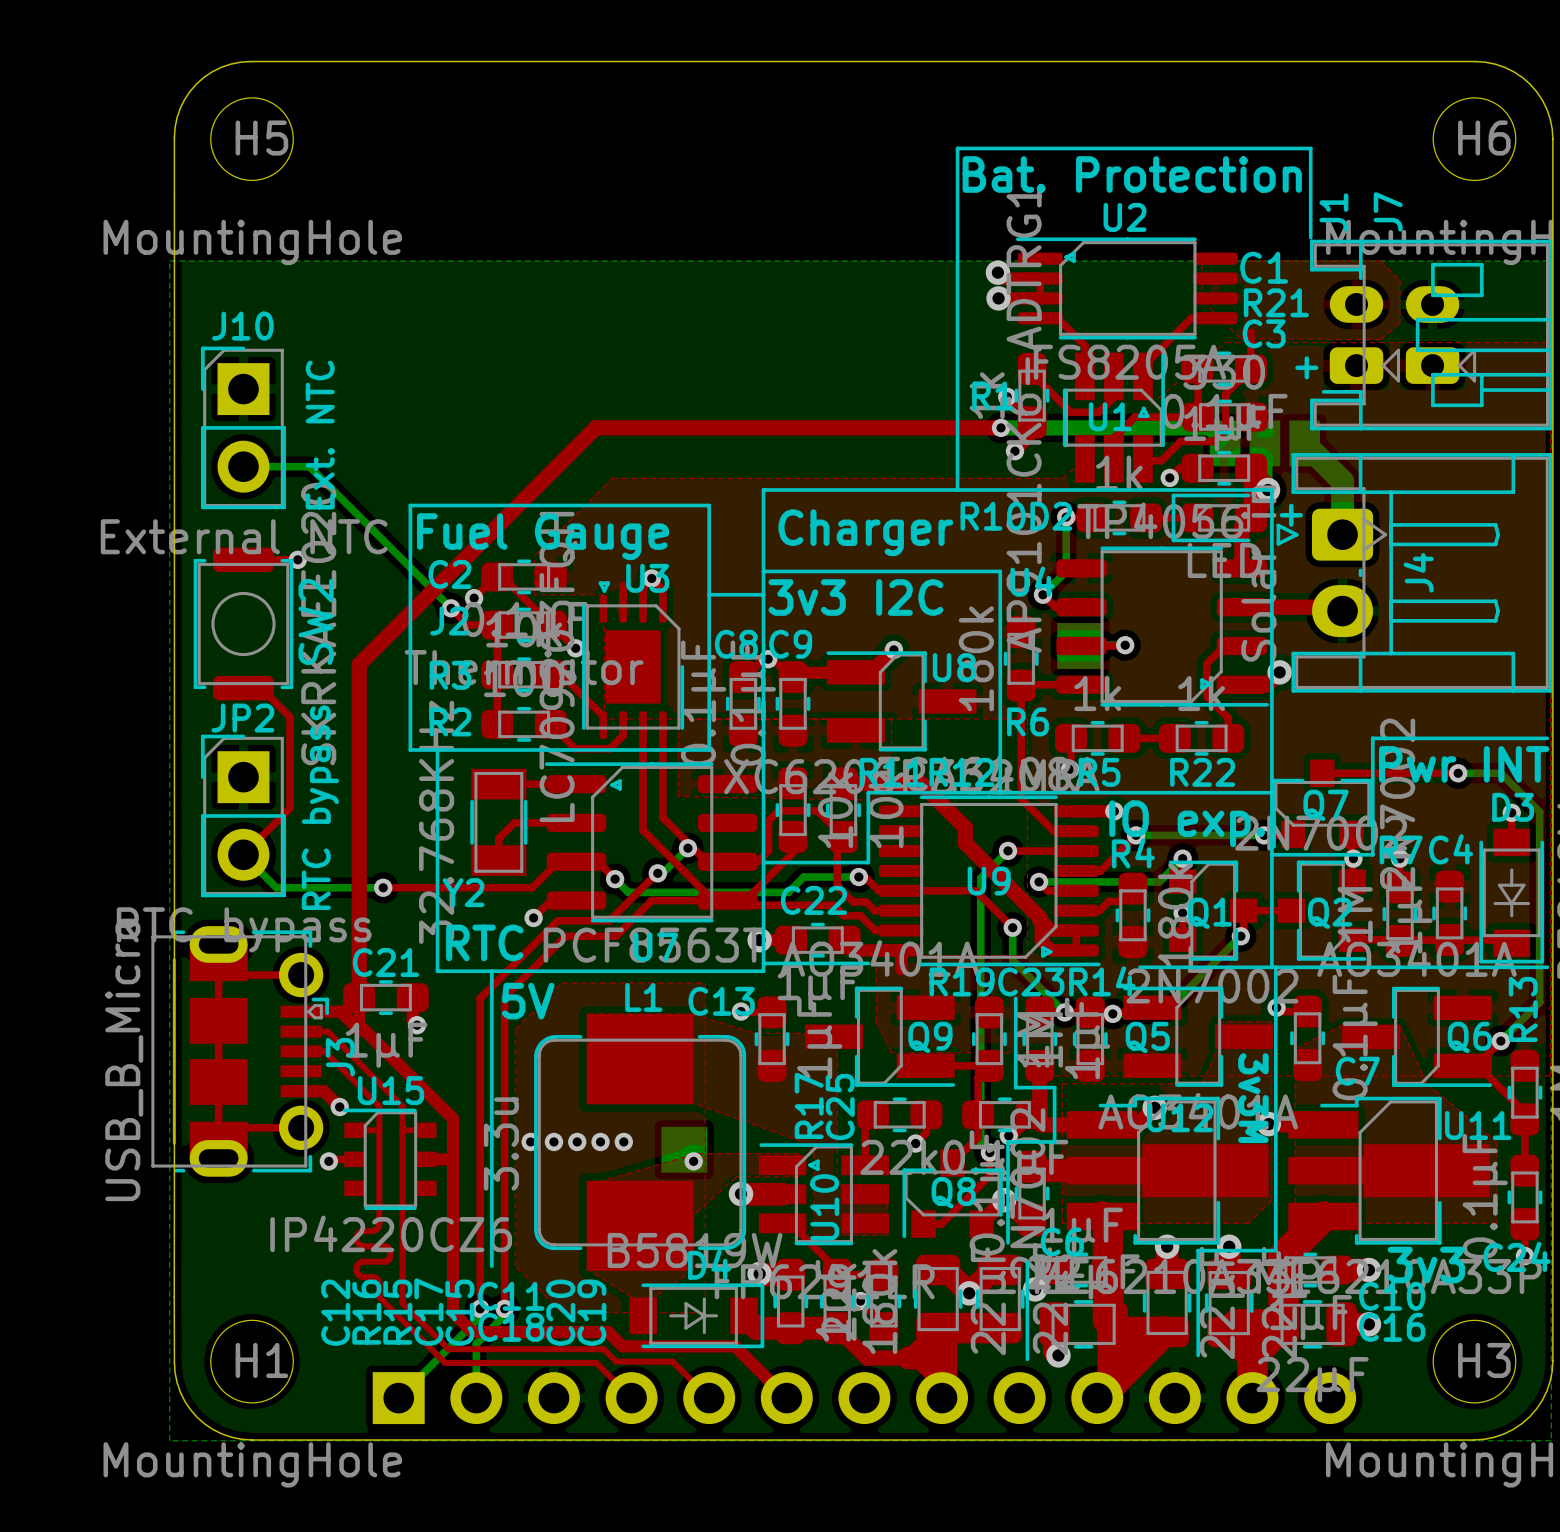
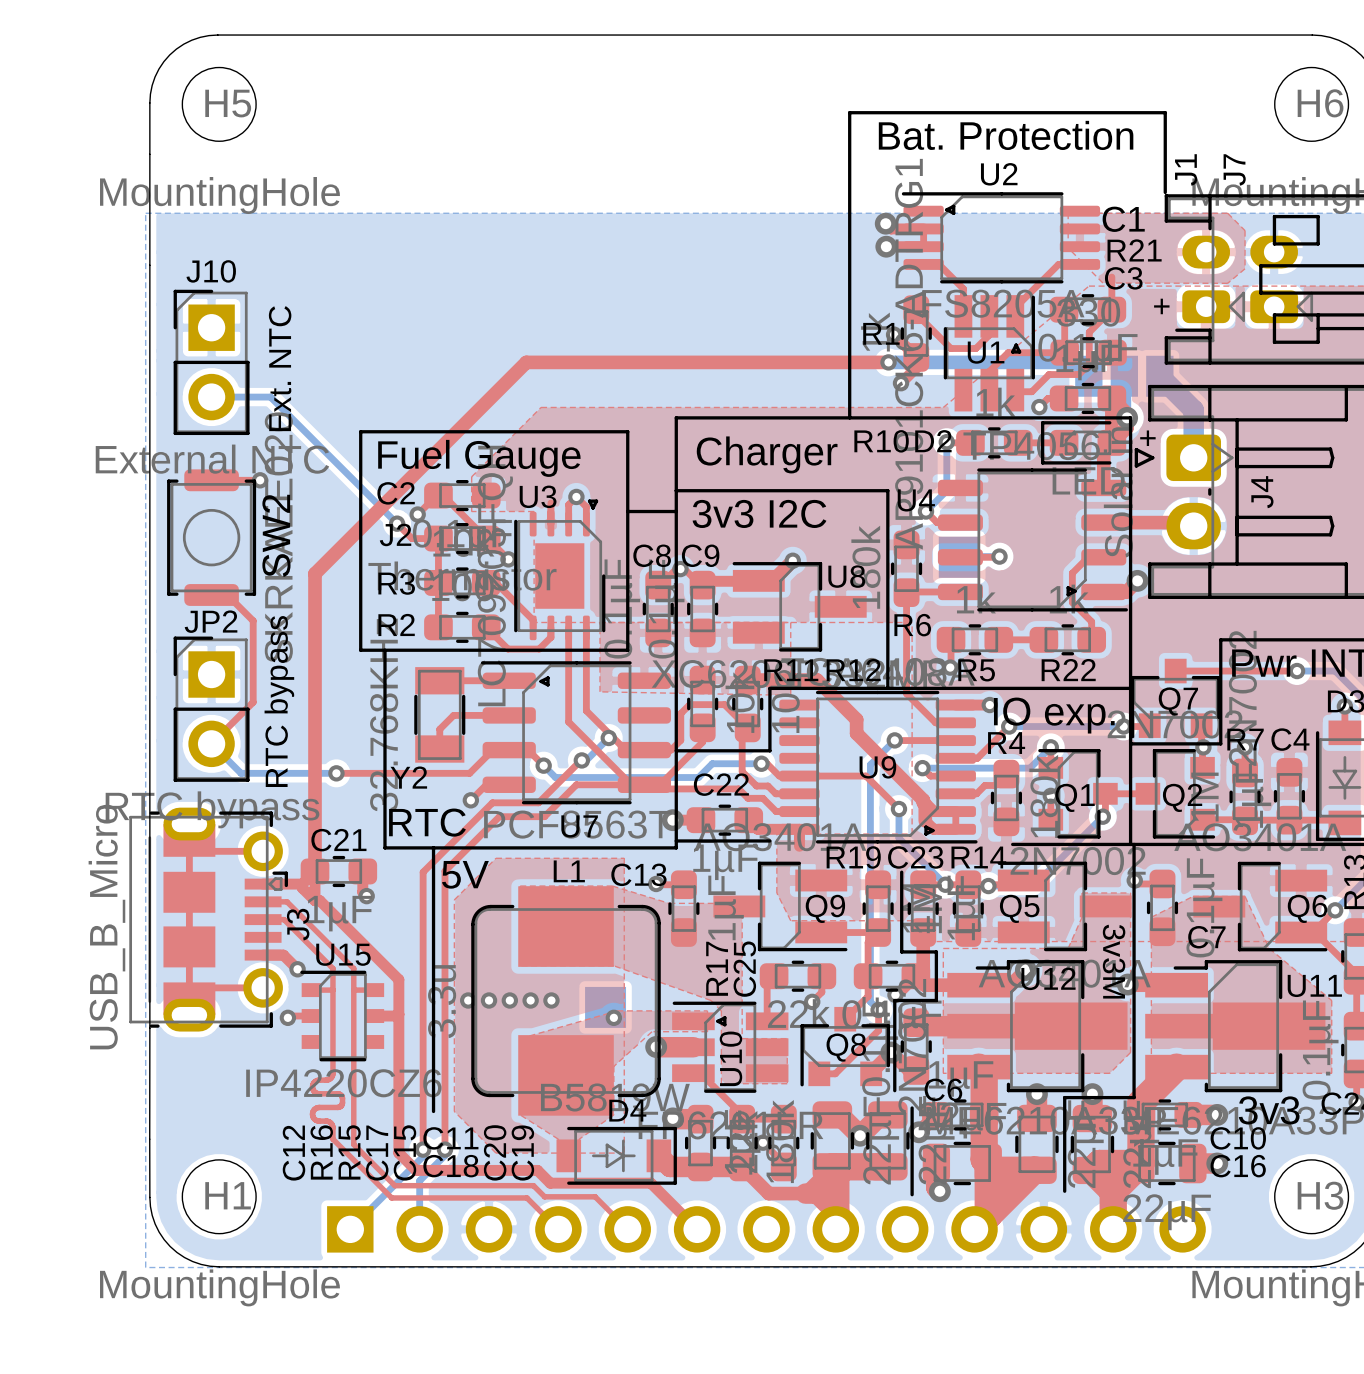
U3 name position: U3 (647, 578) -> U3 (538, 496)
line: (600, 583) (608, 583) (604, 590) (600, 583) -> (589, 501) (596, 501) (593, 508) (589, 501)

